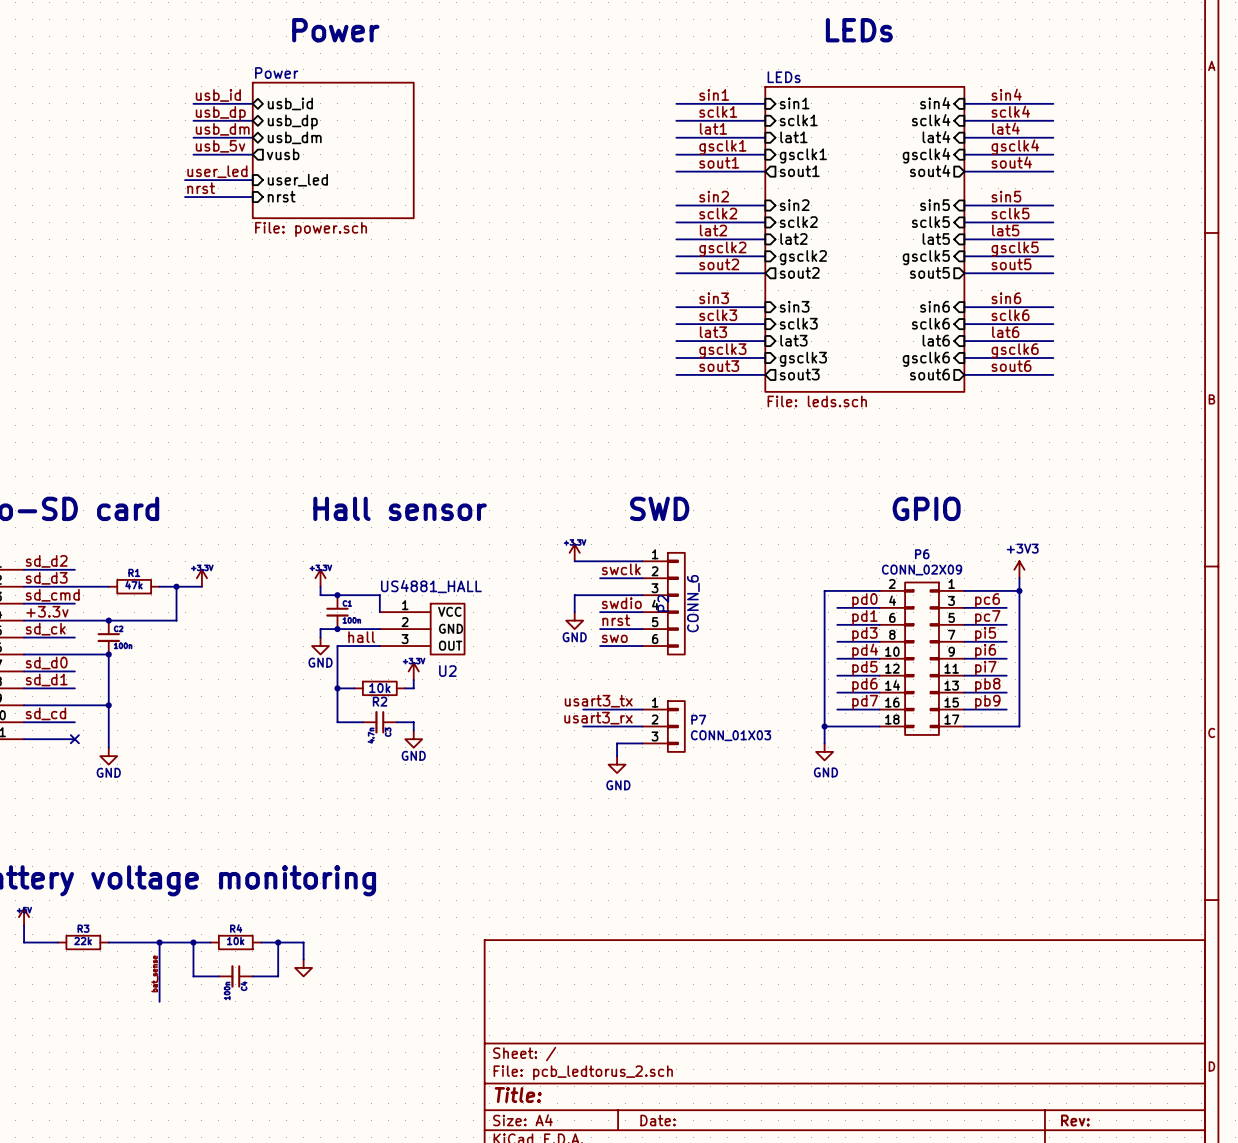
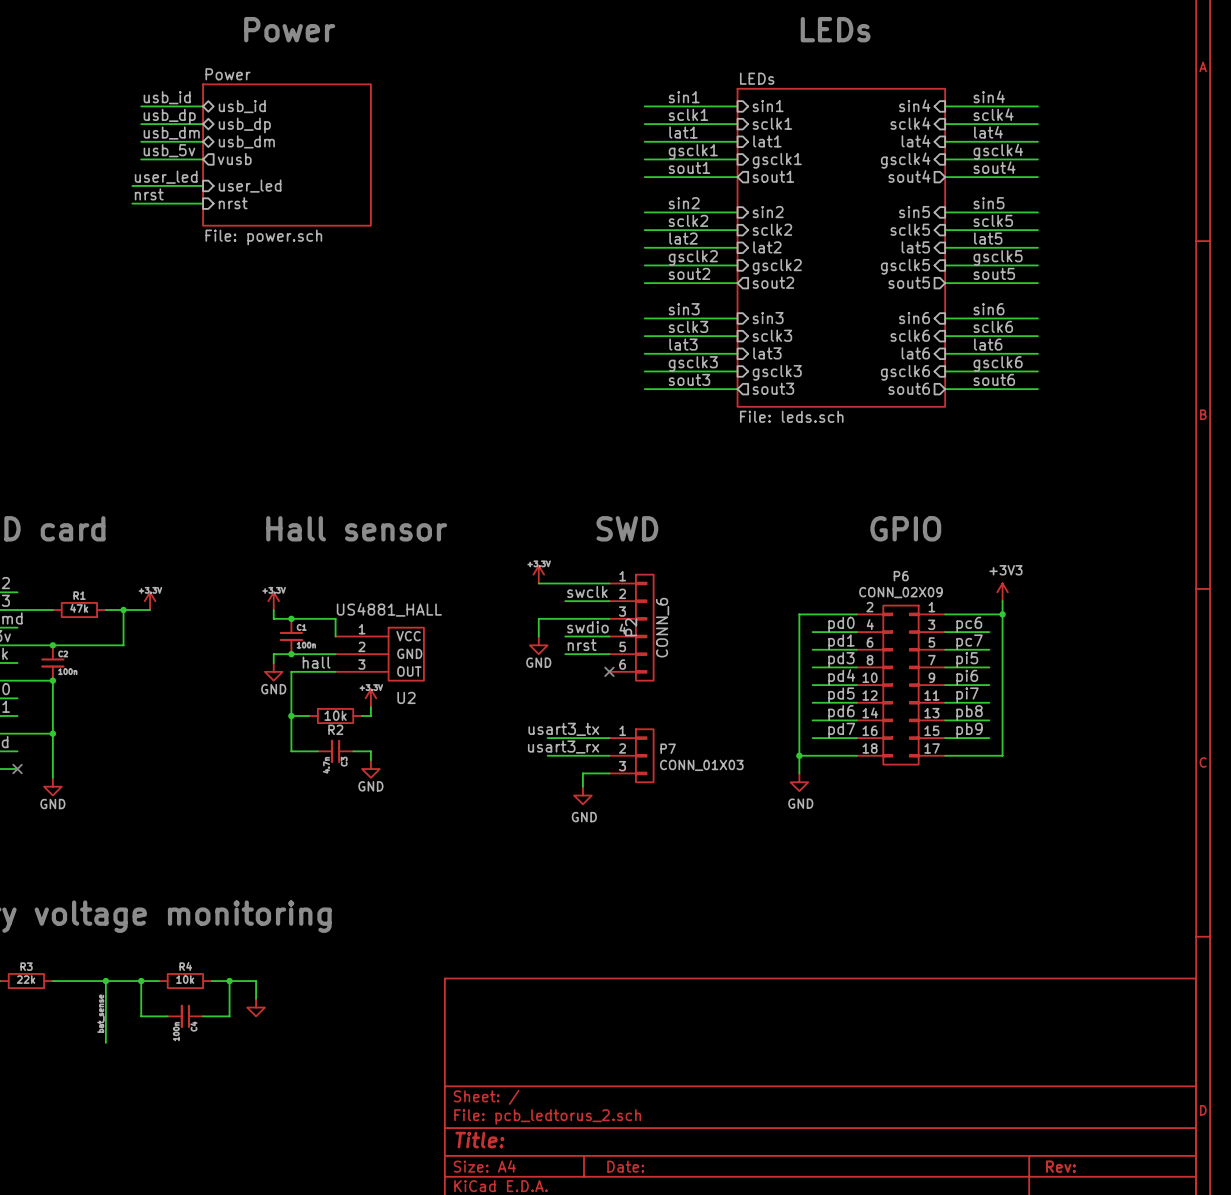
label: swo (614, 638) -> none
wire: (600, 646) (642, 646) -> none
no-connect mark: none -> (609, 671)

